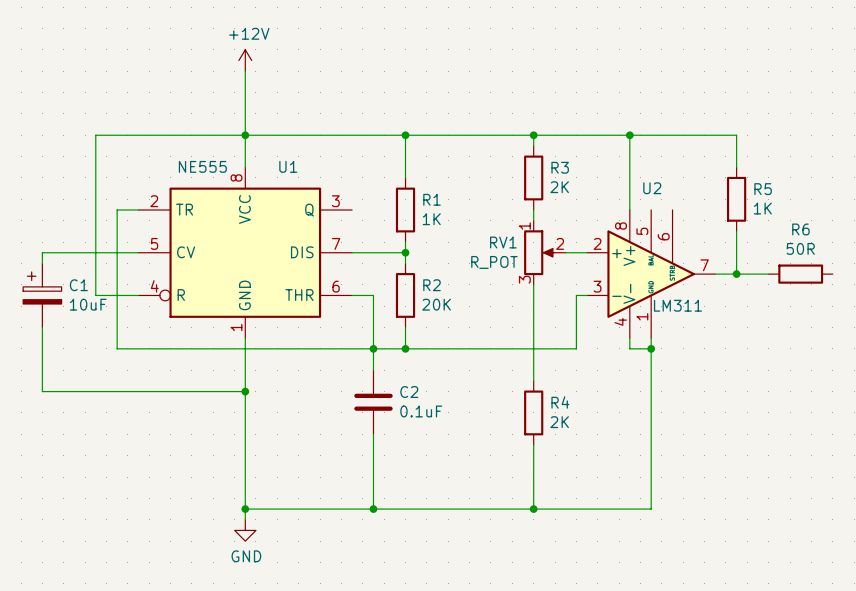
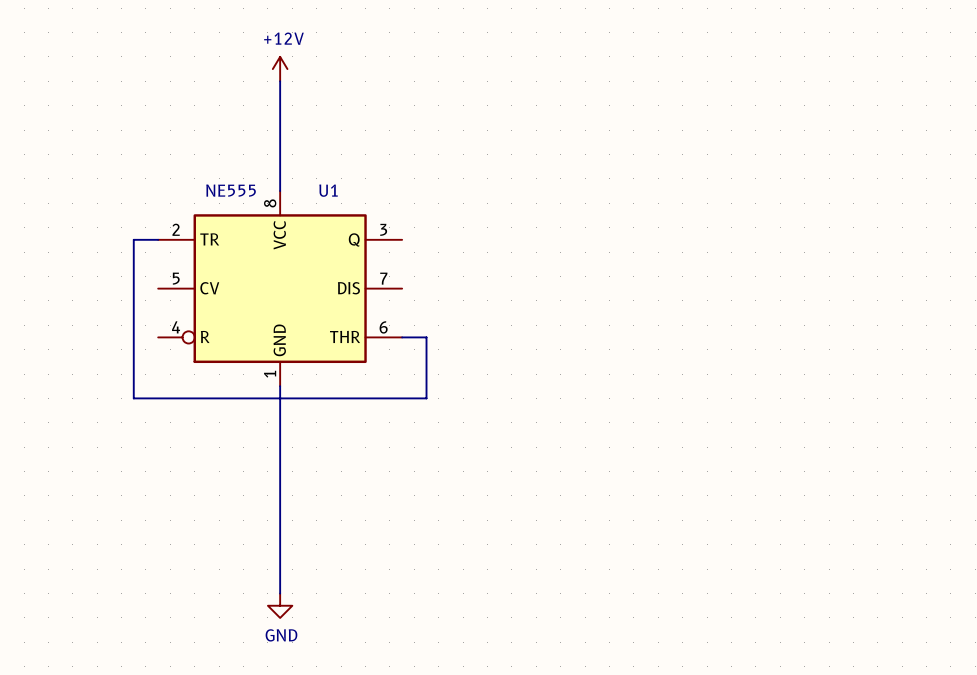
junction: (245, 135) -> none
wire: (405, 135) (405, 177) -> none
junction: (405, 135) -> none
wire: (533, 135) (533, 145) -> none
junction: (533, 135) -> none
wire: (629, 135) (629, 210) -> none
junction: (629, 135) -> none
wire: (736, 167) (736, 135) (95, 135) (95, 295) (138, 295) -> none
R3: 2K (533, 177) -> none
R5: 1K (736, 199) -> none
R1: 1K (405, 210) -> none
wire: (533, 210) (533, 220) -> none
wire: (736, 231) (736, 274) -> none
wire: (405, 242) (405, 263) -> none
wire: (138, 252) (42, 252) (42, 263) -> none
wire: (352, 252) (405, 252) -> none
junction: (405, 252) -> none
RV1: R_POT (544, 252) -> none
wire: (565, 252) (587, 252) -> none
U2: LM311 (651, 274) -> none
wire: (715, 274) (768, 274) -> none
junction: (736, 274) -> none
R6: 50R (800, 274) -> none
wire: (533, 284) (533, 380) -> none
C1: 10uF (42, 295) -> none
R2: 20K (405, 295) -> none
wire: (587, 295) (576, 295) (576, 348) (373, 348) (373, 370) -> none
wire: (42, 327) (42, 391) (245, 391) -> none
wire: (405, 327) (405, 348) -> none
wire: (629, 338) (629, 348) (651, 348) -> none
wire: (651, 338) (651, 509) (245, 509) -> none
junction: (373, 348) -> none
junction: (405, 348) -> none
junction: (651, 348) -> none
junction: (245, 391) -> none
C2: 0.1uF (373, 402) -> none
R4: 2K (533, 412) -> none
wire: (373, 434) (373, 509) -> none
wire: (533, 444) (533, 509) -> none
junction: (245, 509) -> none
junction: (373, 509) -> none
junction: (533, 509) -> none

